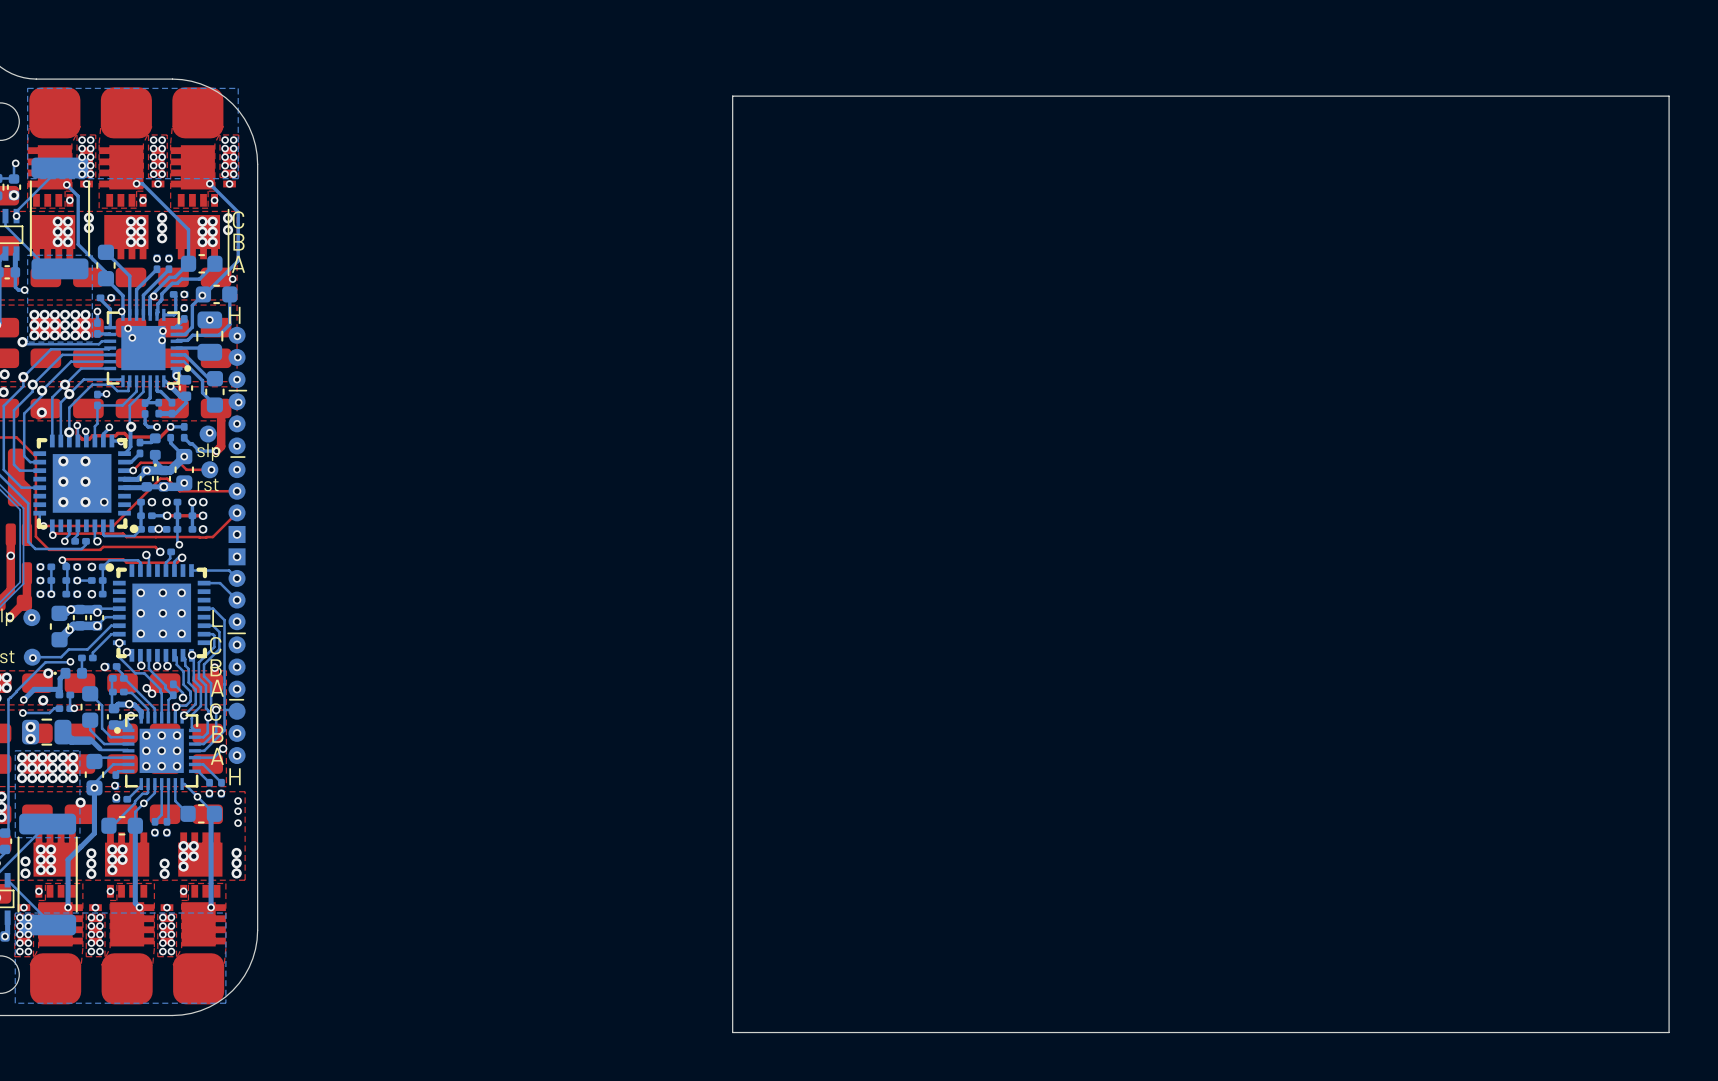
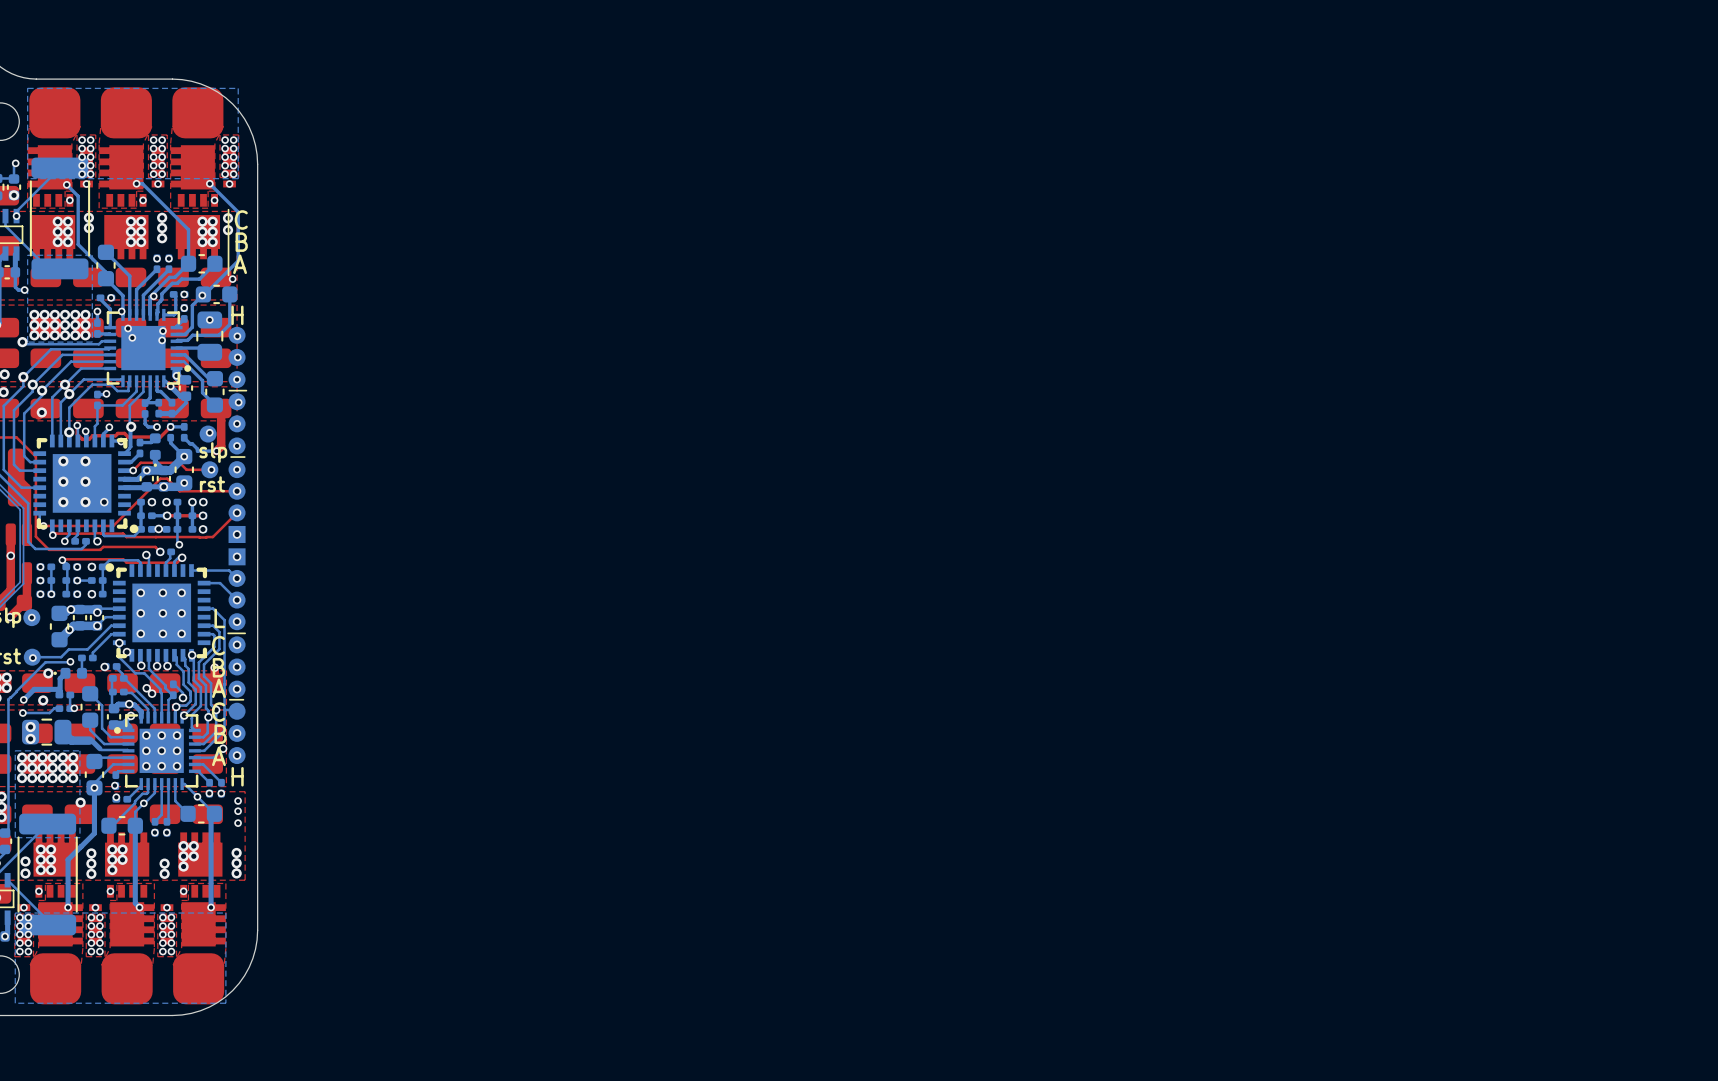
board edge: (1669, 96) (732, 96) (732, 1032) (1669, 1032) (1669, 96) -> none

